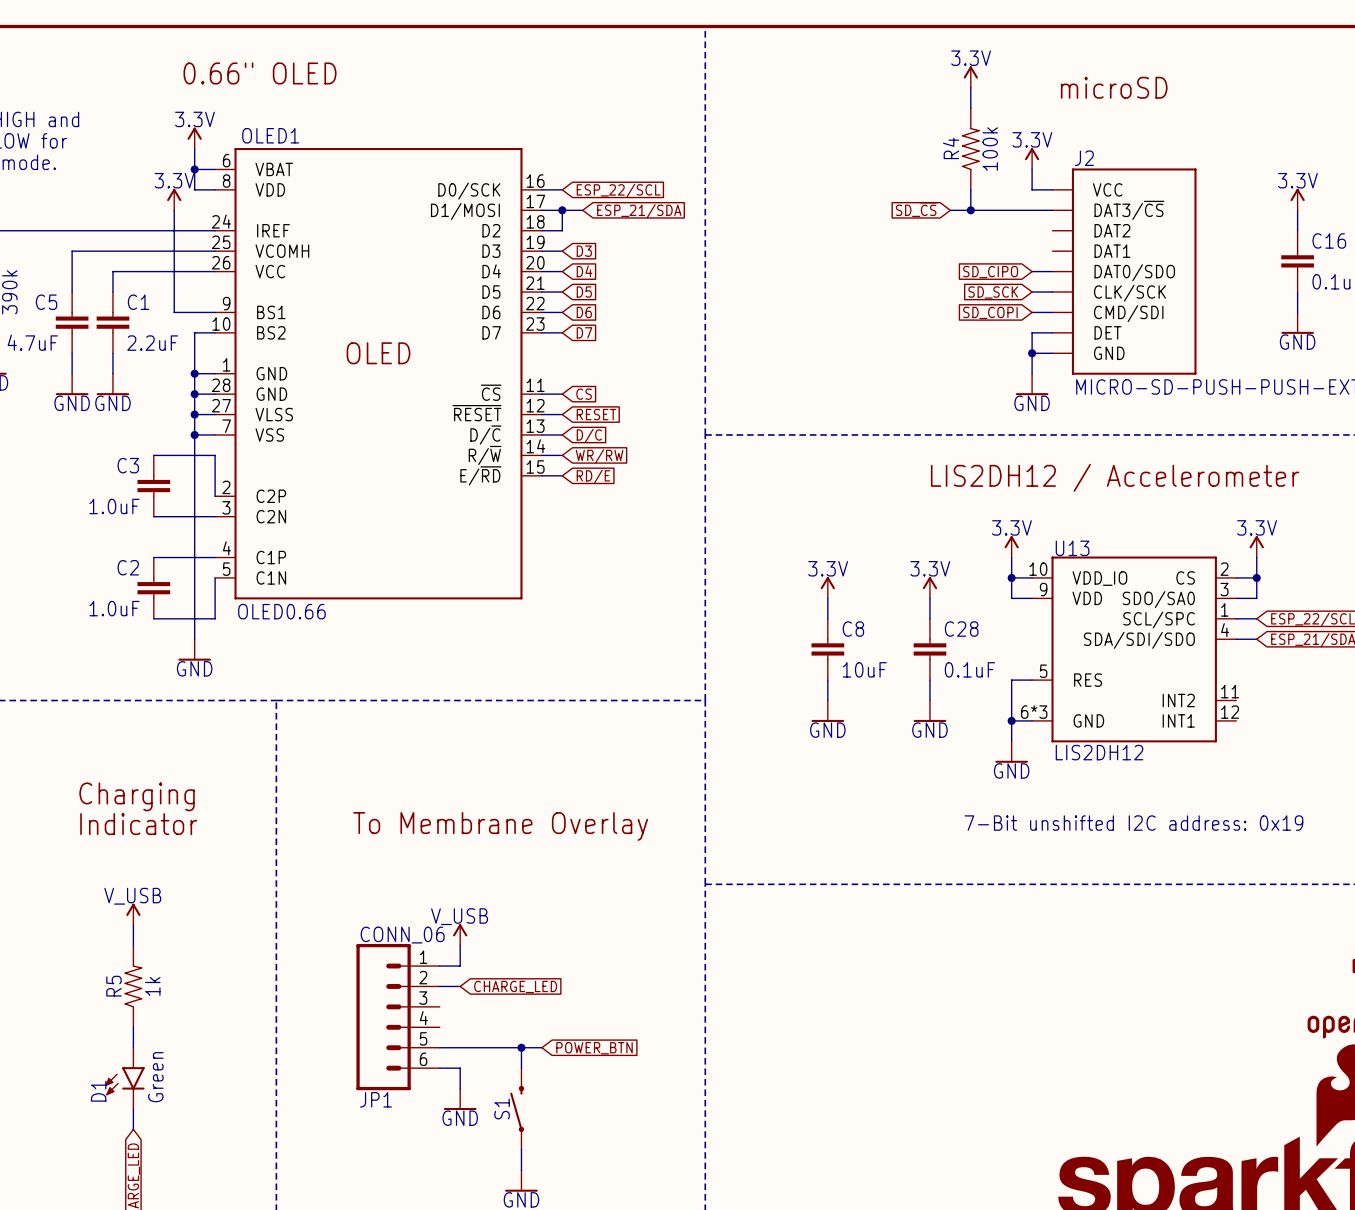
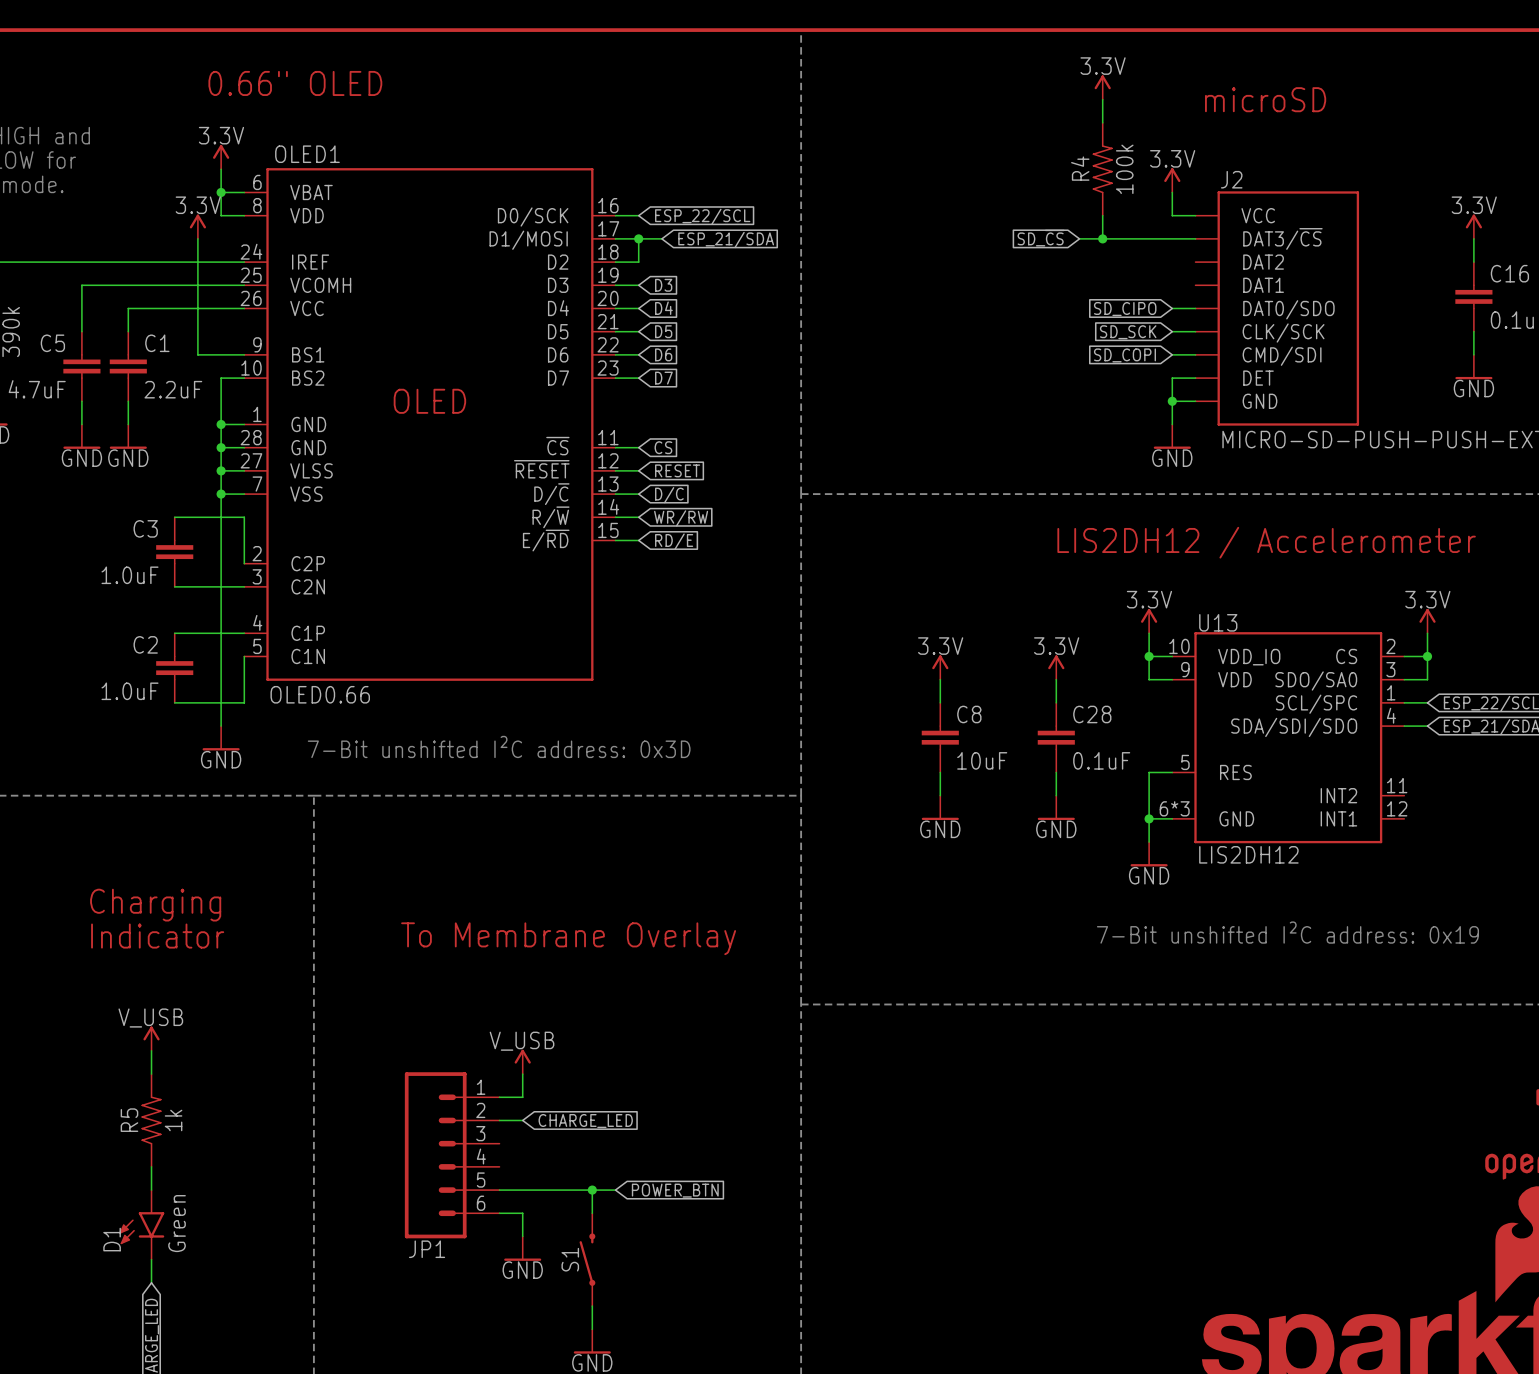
text: none -> 7-Bit unshifted I²C address: 0x3D (499, 746)
text: 7-Bit unshifted I2C address: 0x19 (1133, 823) -> 7-Bit unshifted I²C address: 0x19 (1287, 932)
JP1 value: CONN_06 (402, 935) -> none

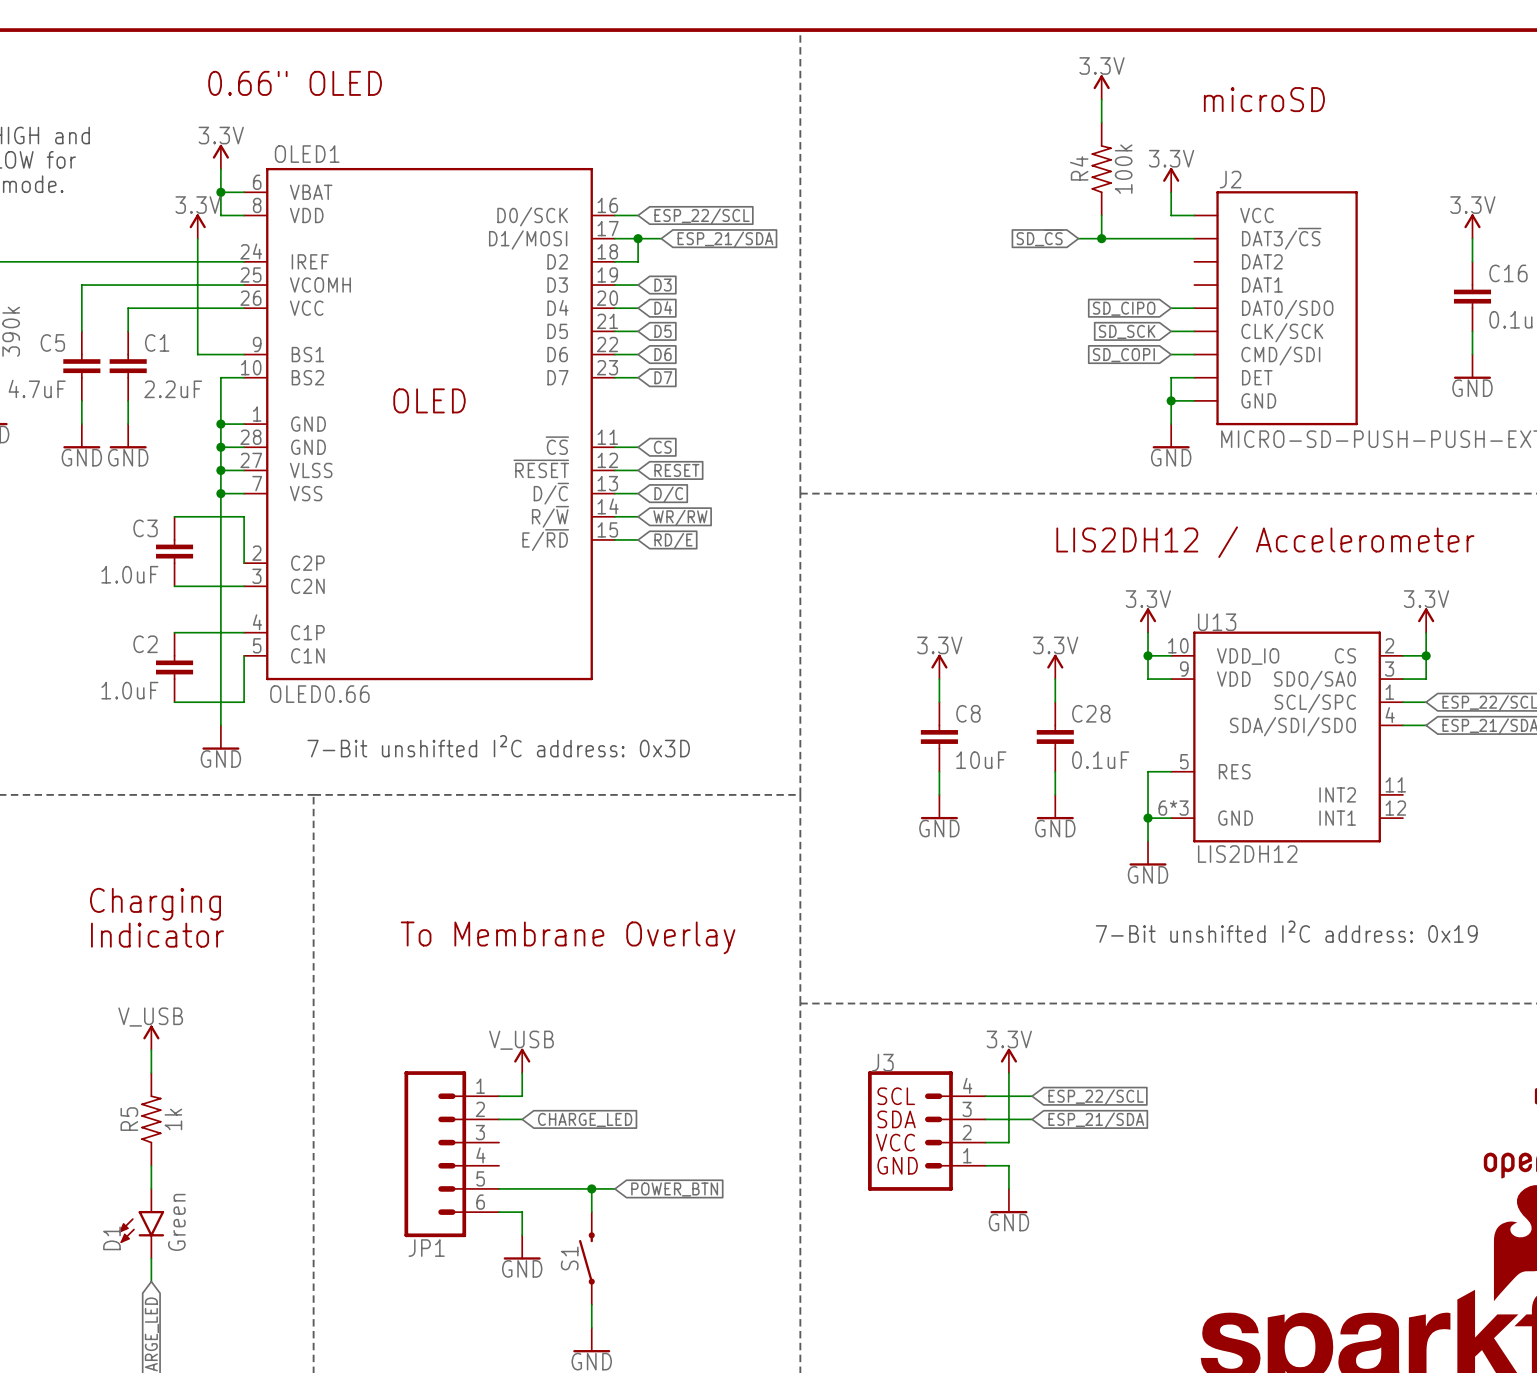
power symbol: none -> 3.3V (1008, 1060)
wire: none -> (1008, 1073) (1008, 1142) (985, 1142)
wire: none -> (985, 1096) (1032, 1096)
global label: none -> ESP_22/SCL (1096, 1097)
wire: none -> (985, 1119) (1032, 1119)
global label: none -> ESP_21/SDA (1096, 1120)
J3: none -> (926, 1131)
wire: none -> (985, 1165) (1008, 1165) (1008, 1188)
power symbol: none -> GND (1008, 1201)

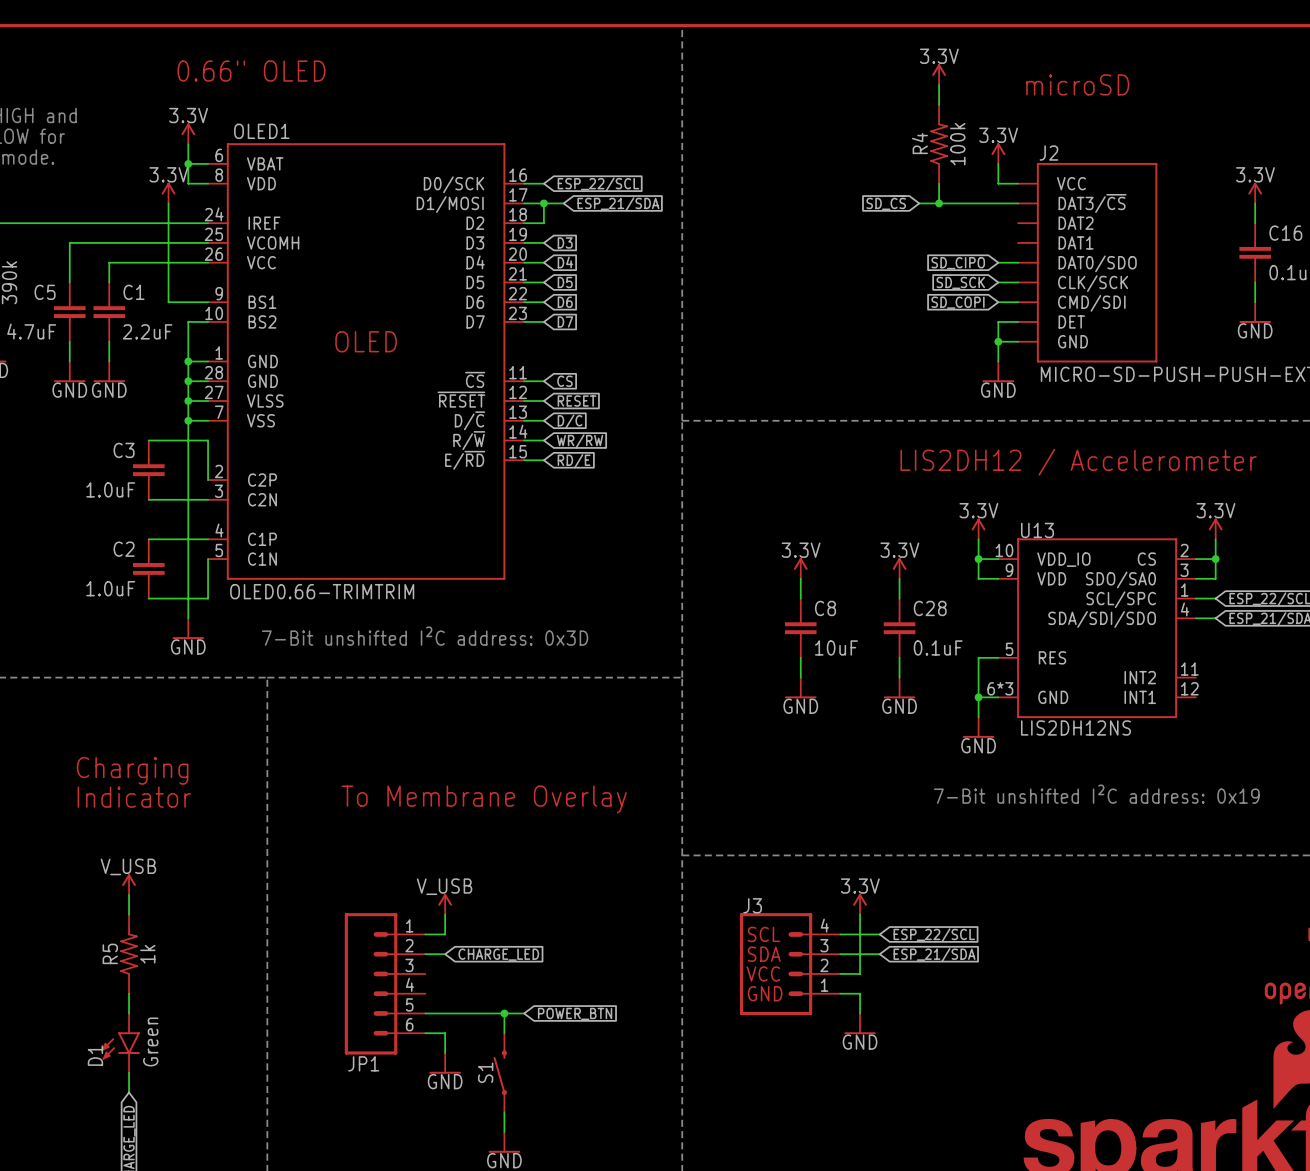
OLED1 value: OLED0.66 (319, 694) -> OLED0.66-TRIMTRIM (322, 591)
U13 value: LIS2DH12 (1247, 854) -> LIS2DH12NS (1076, 727)

